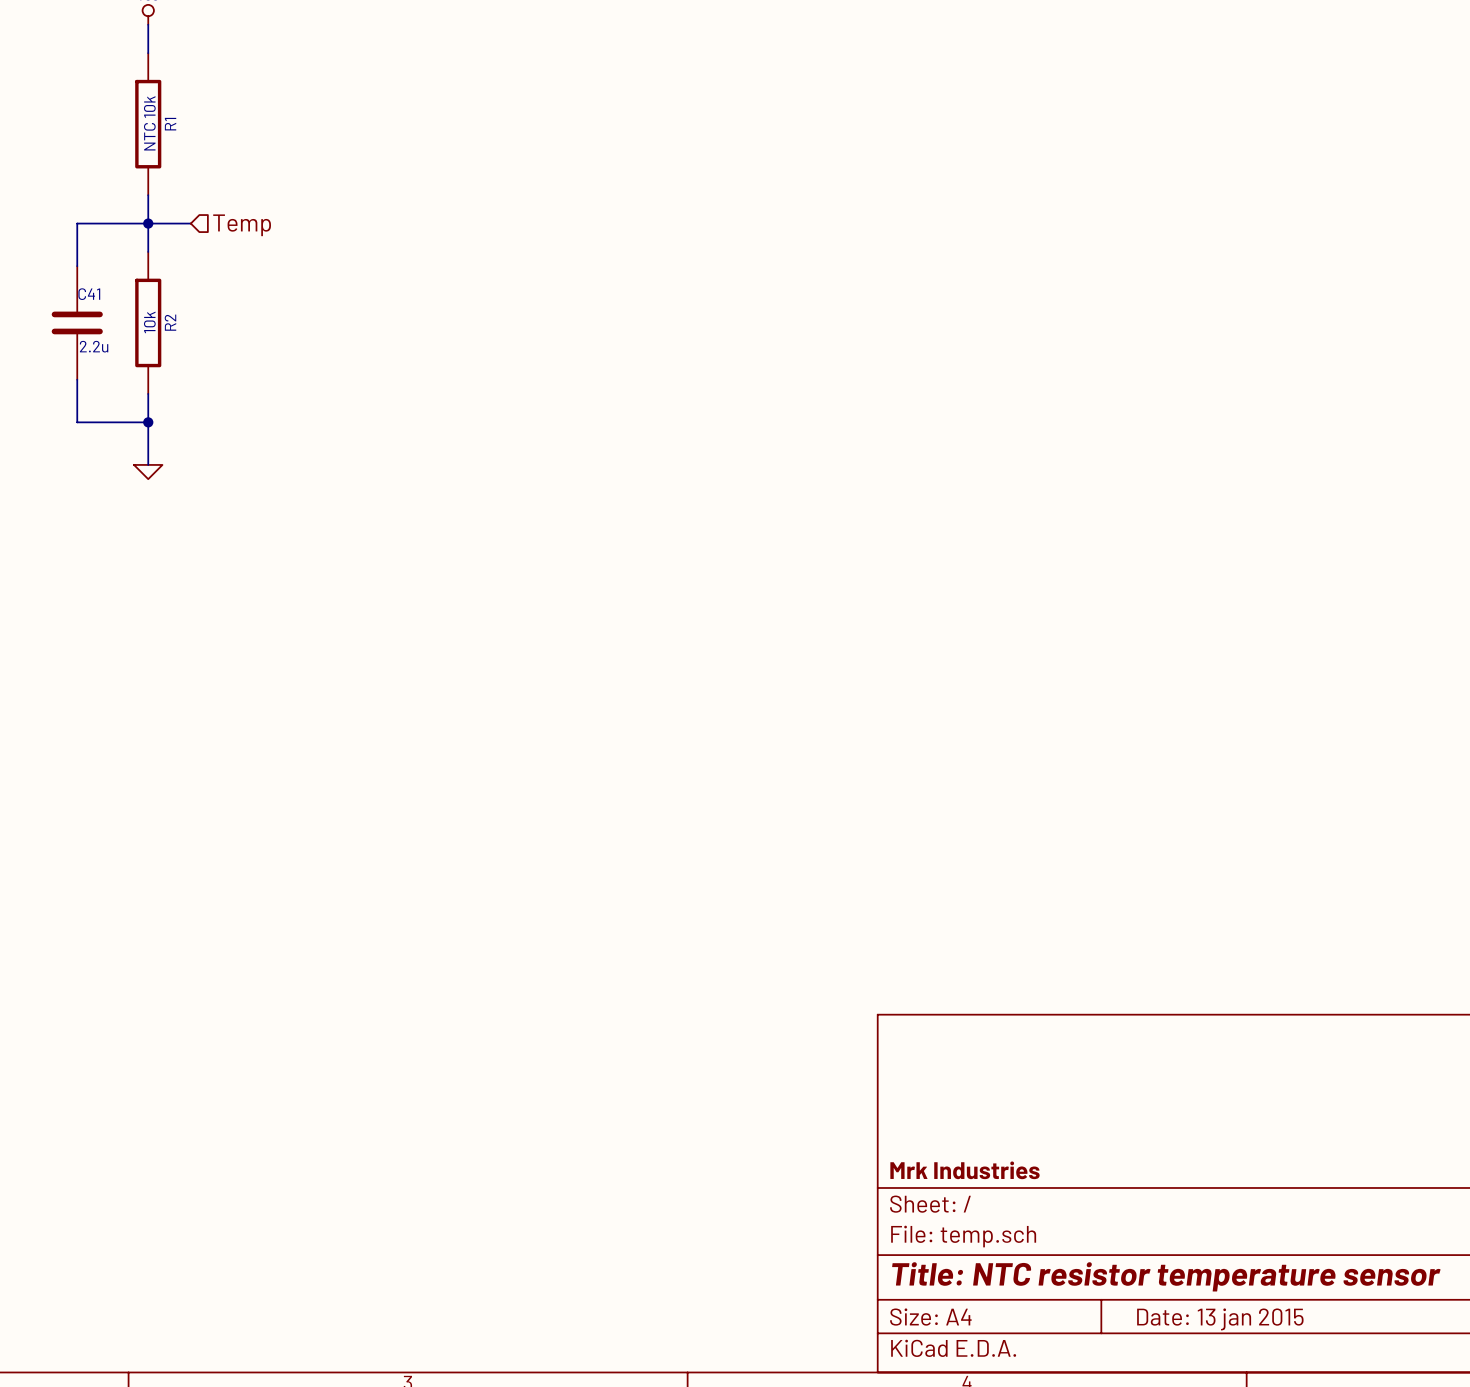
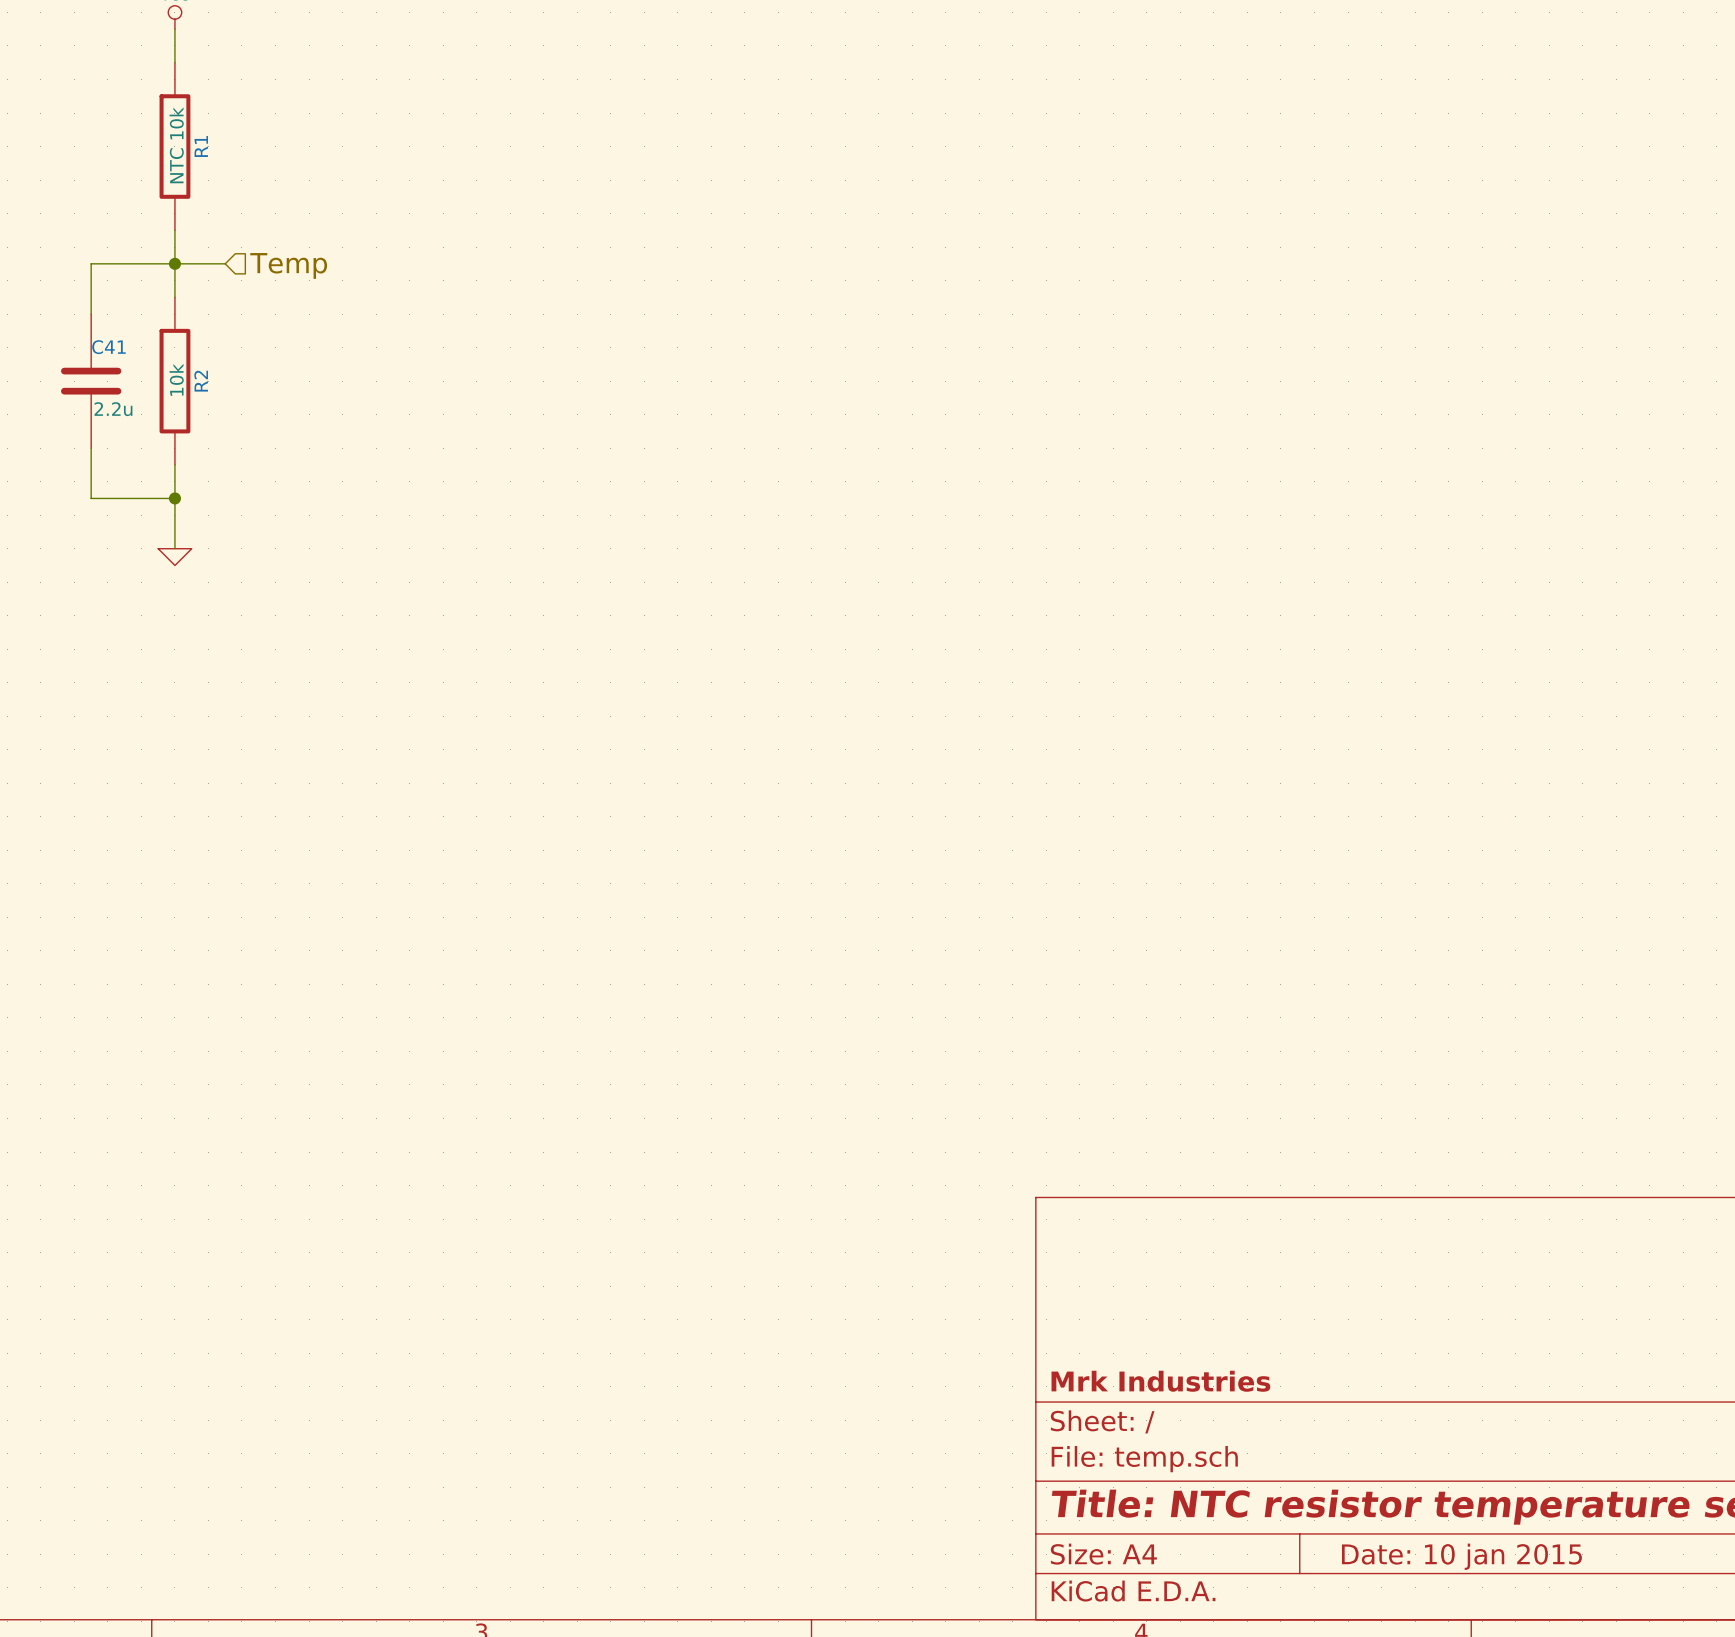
title block: Date: 13 jan 2015 (1220, 1319) -> Date: 10 jan 2015 (1461, 1556)

